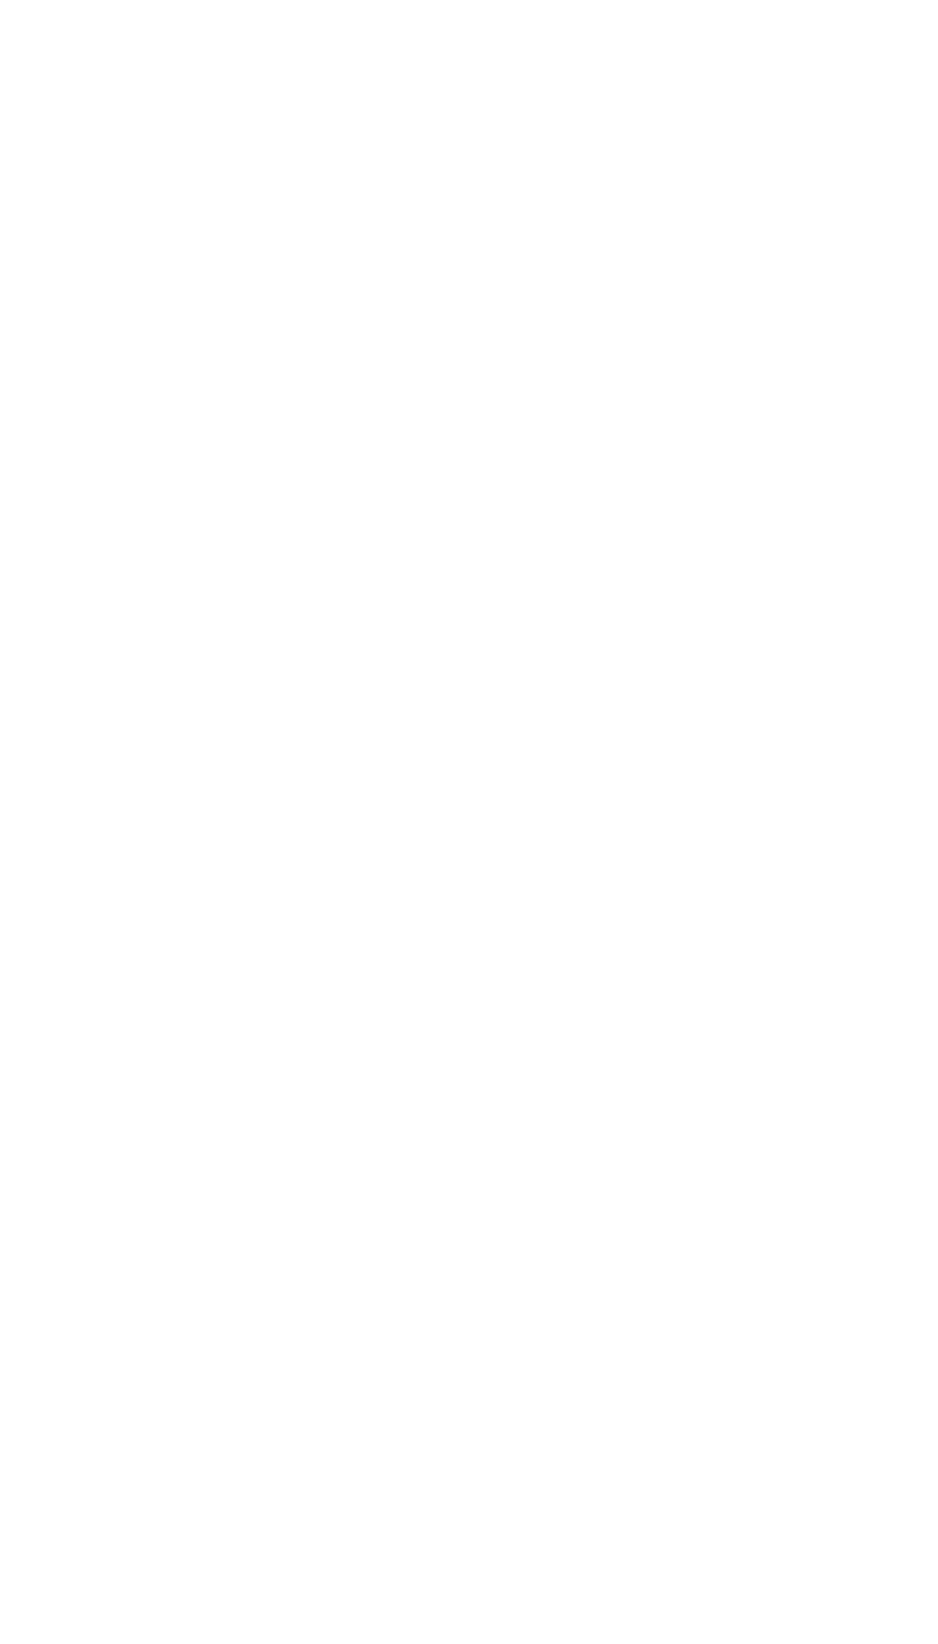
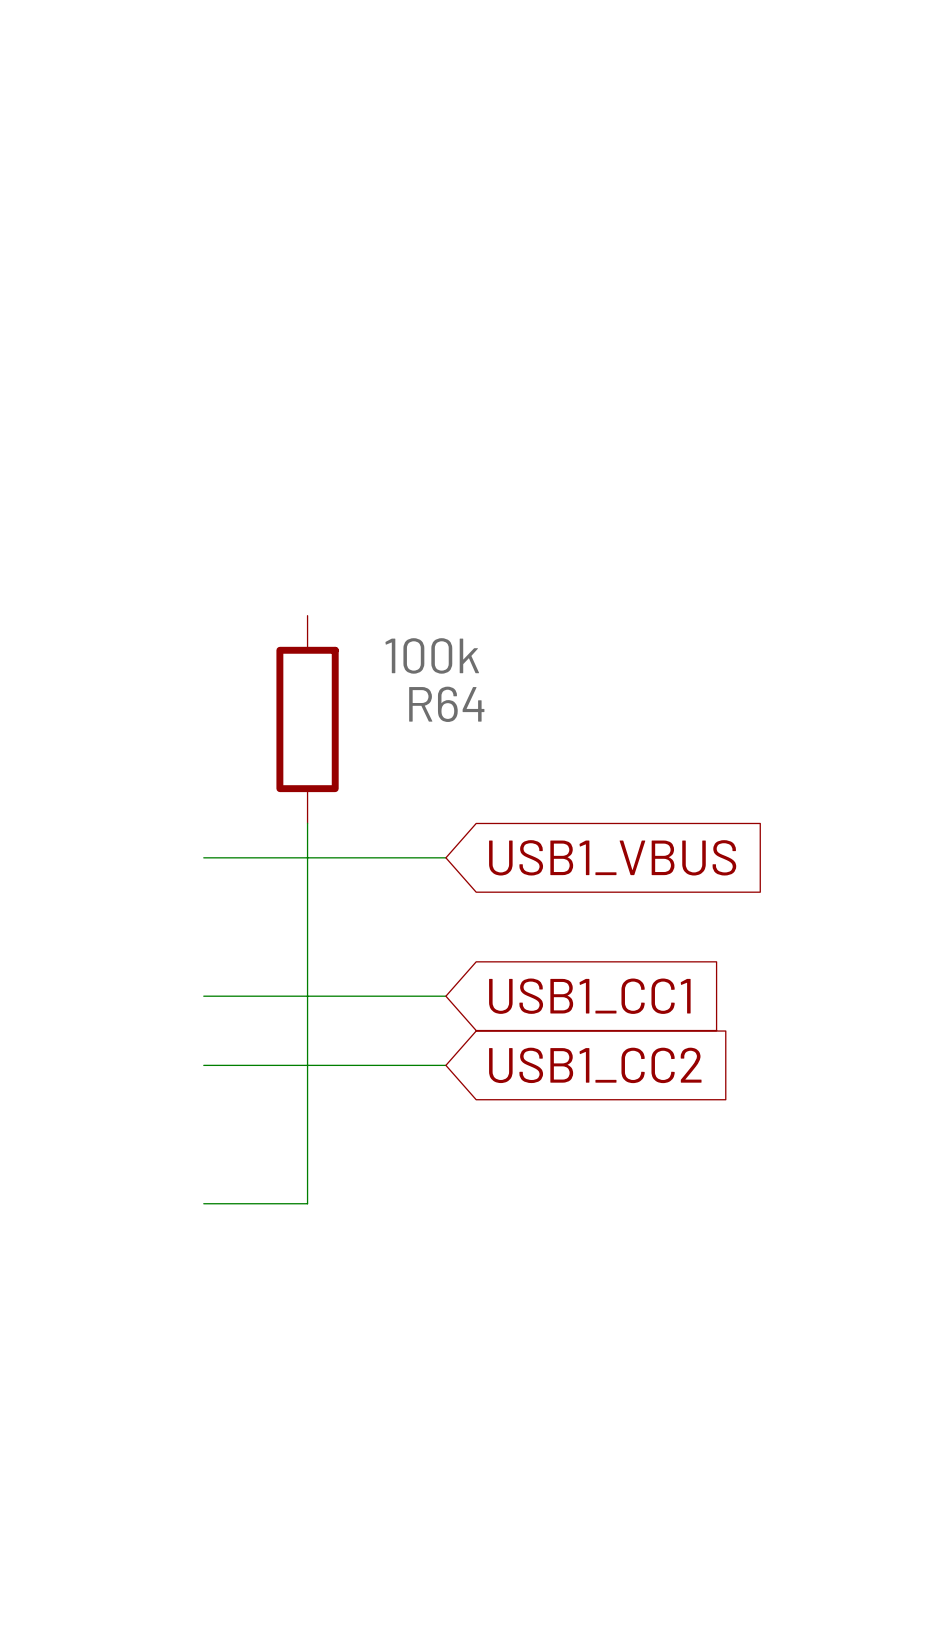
R64: none -> 100k (307, 719)
wire: none -> (307, 823) (307, 1203) (203, 1203)
wire: none -> (203, 857) (445, 857)
global label: none -> USB1_VBUS (612, 857)
wire: none -> (203, 996) (445, 996)
global label: none -> USB1_CC1 (589, 996)
wire: none -> (203, 1065) (445, 1065)
global label: none -> USB1_CC2 (595, 1065)

